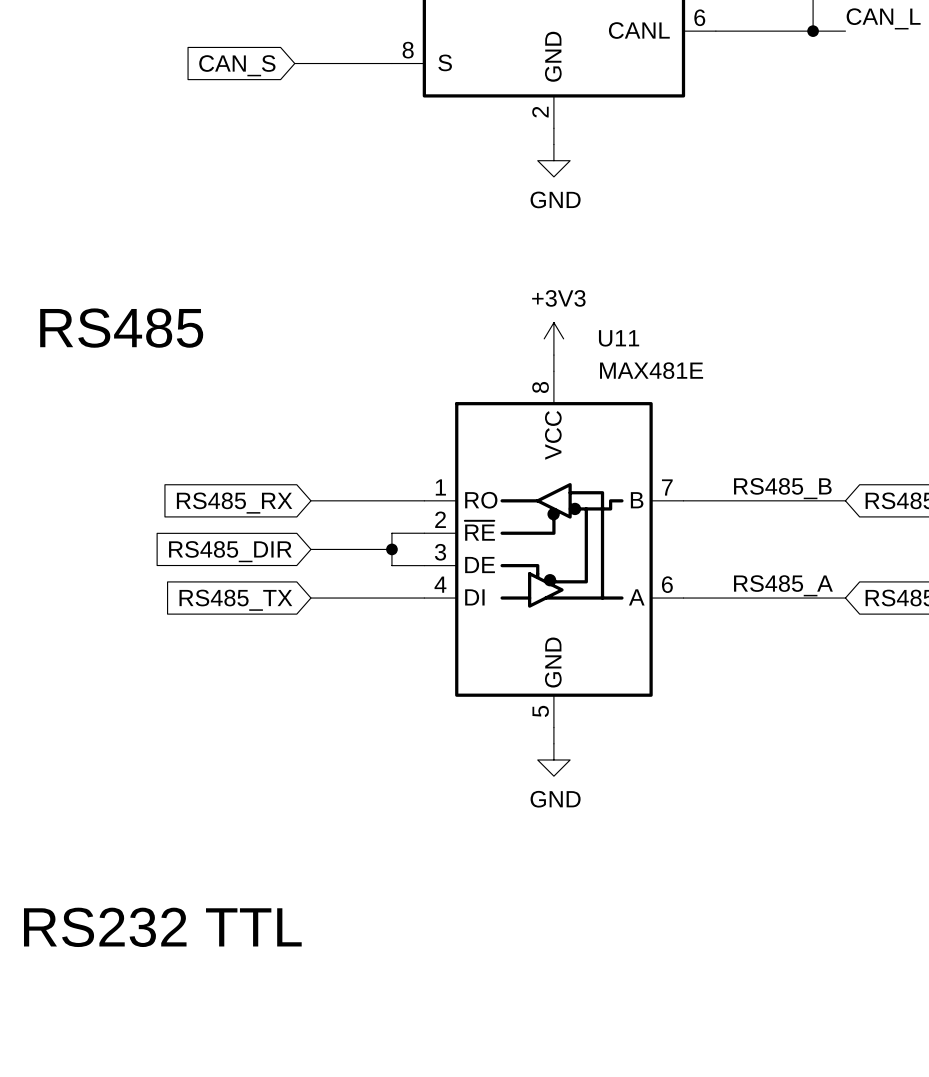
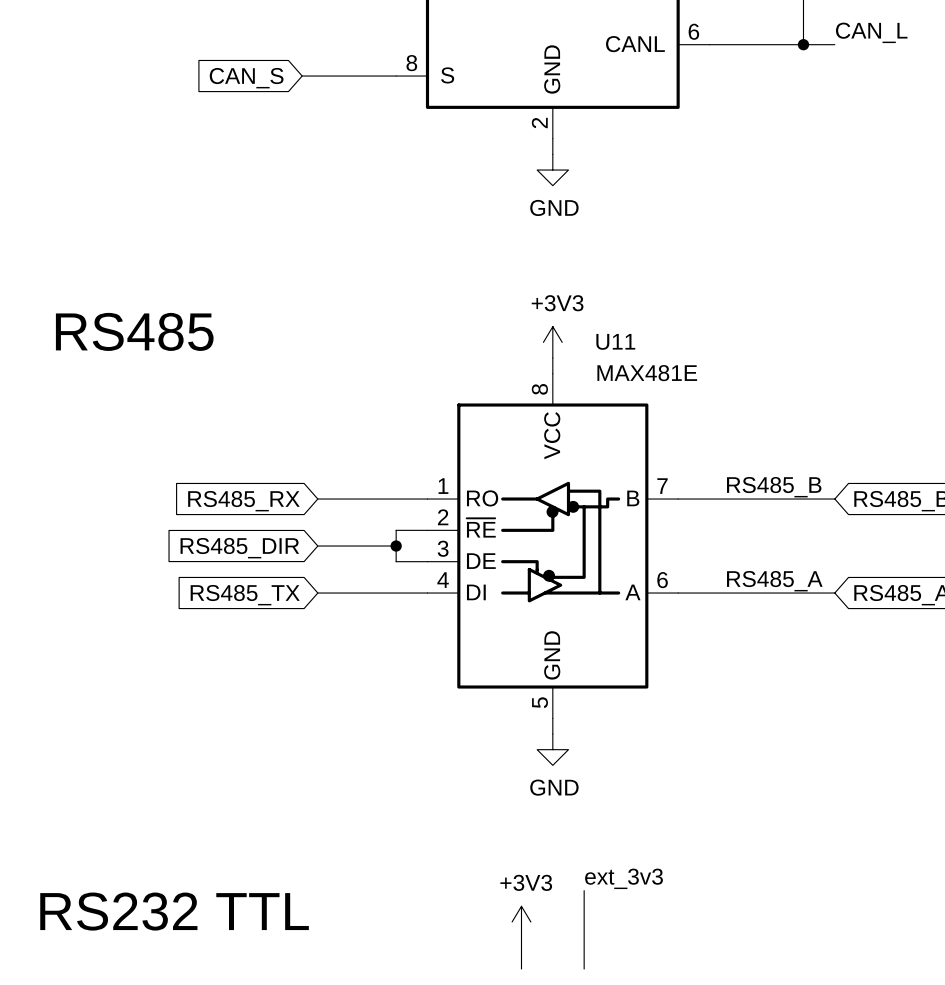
label: none -> ext_3v3 (624, 878)
wire: none -> (584, 890) (584, 969)
power symbol: none -> +3V3 (521, 922)
wire: none -> (521, 937) (521, 969)

